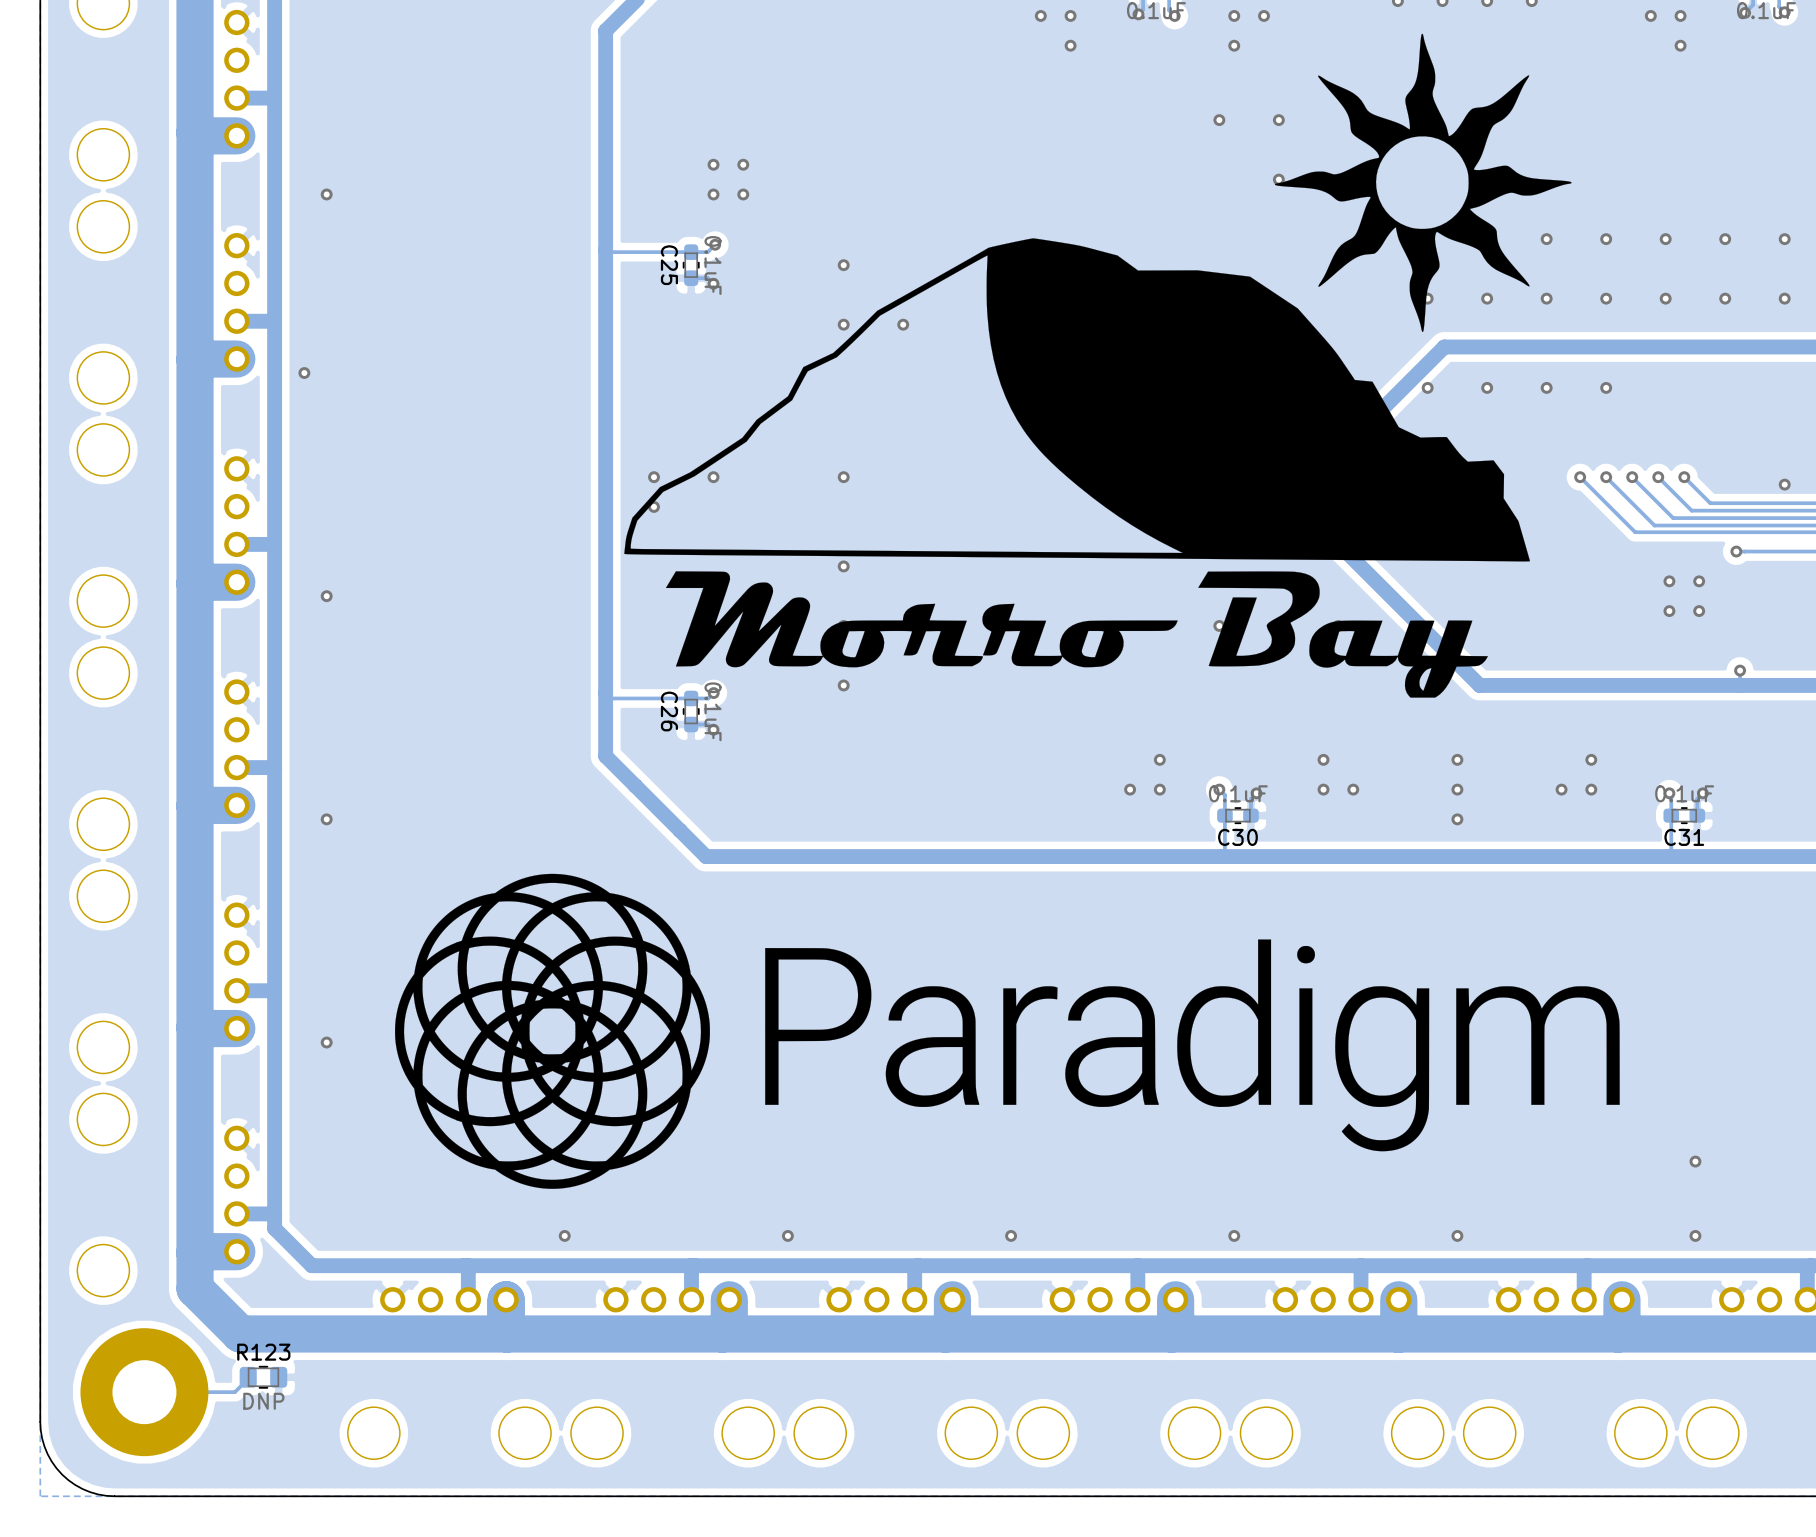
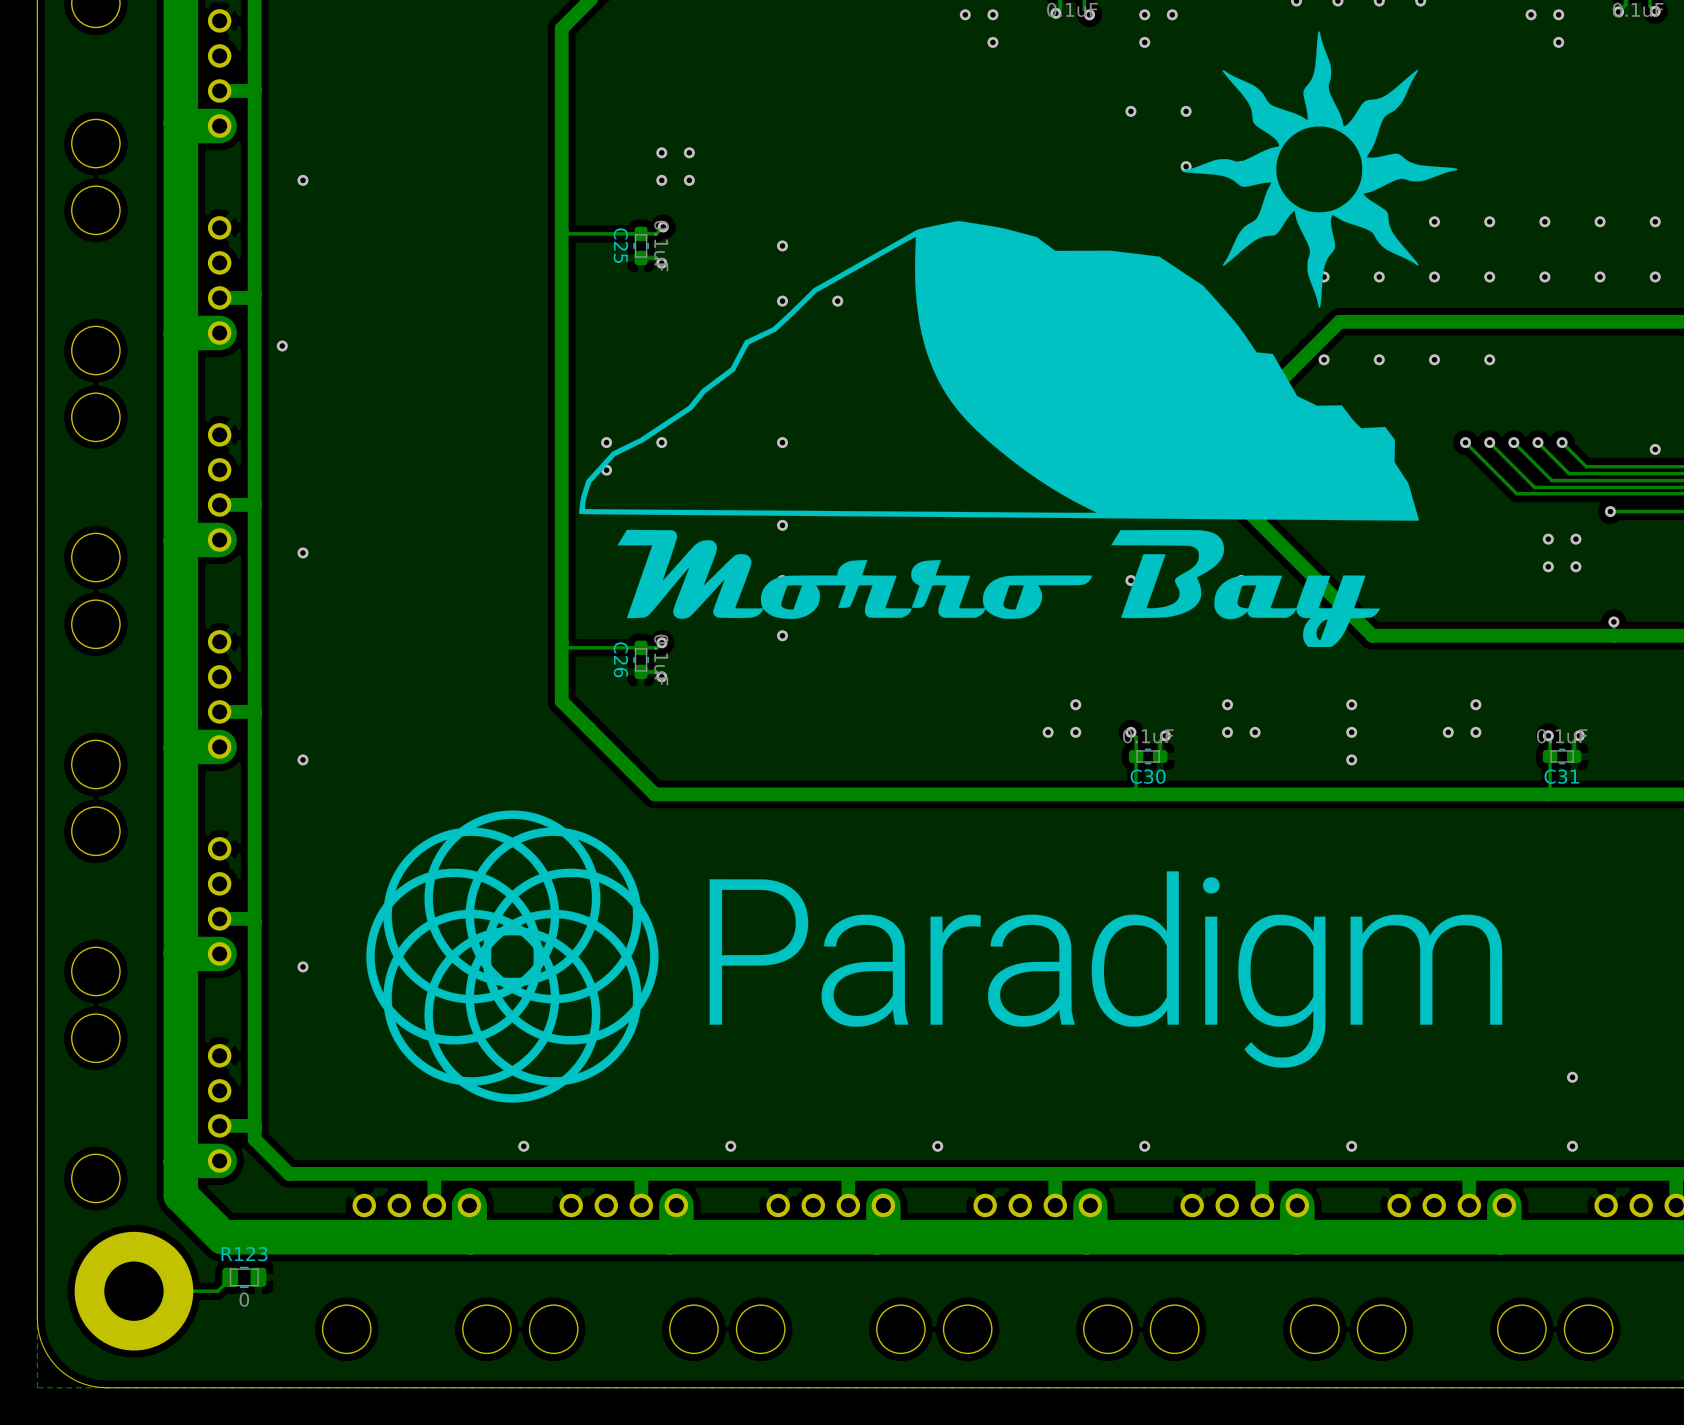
R123 value: DNP (263, 1401) -> 0 (244, 1299)

